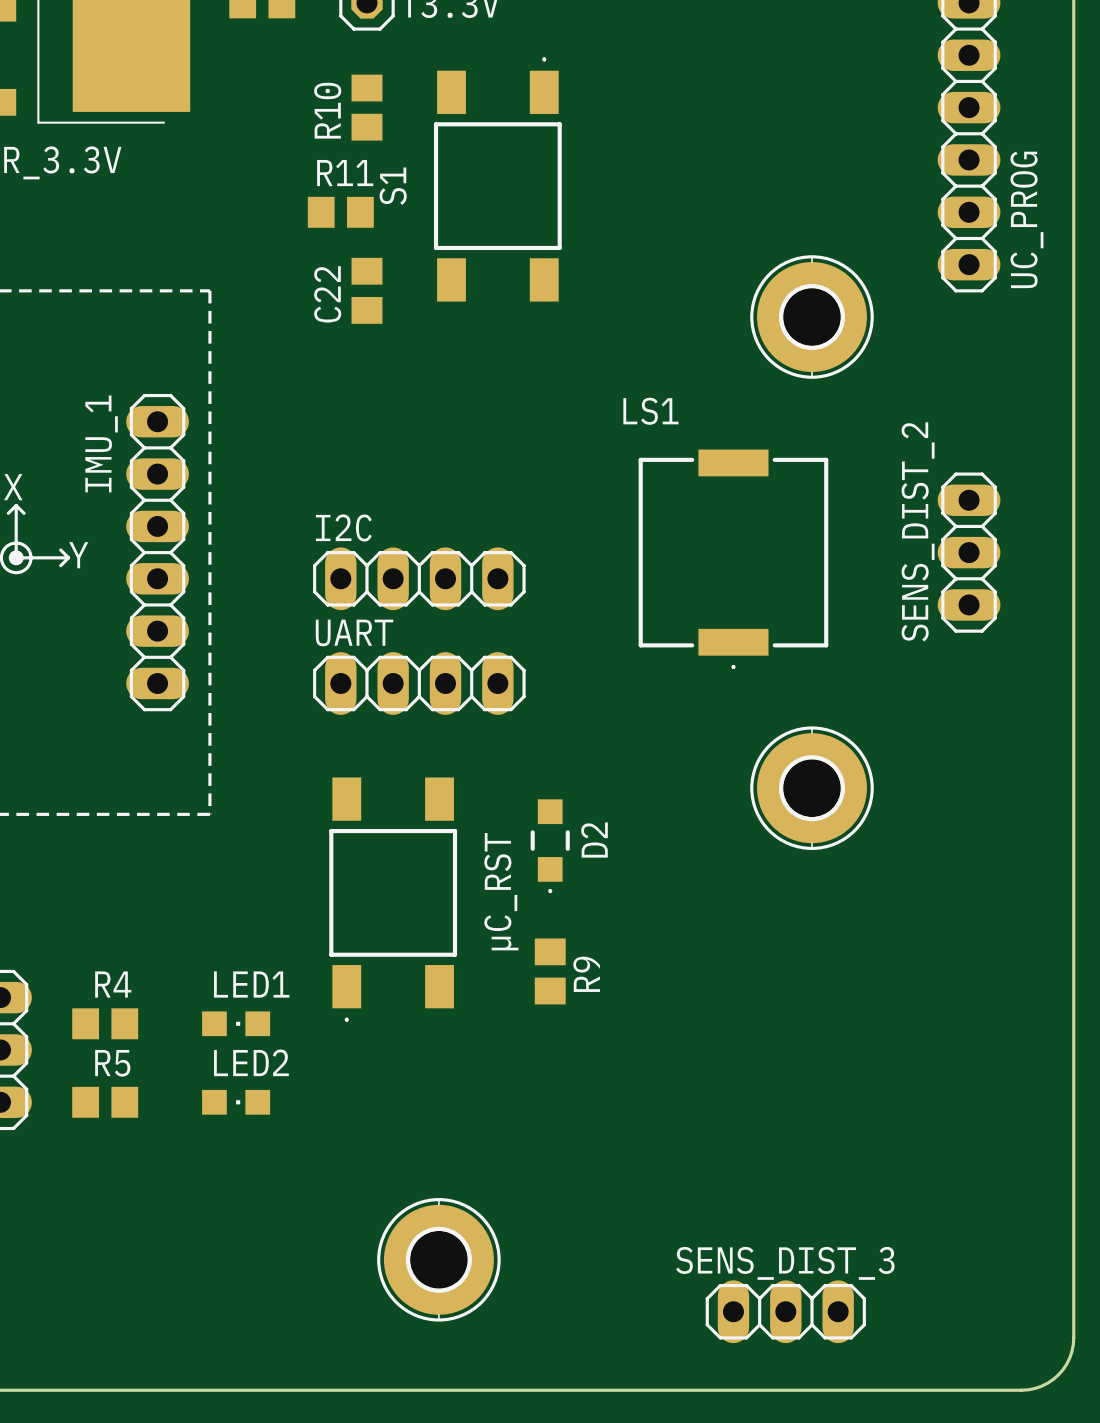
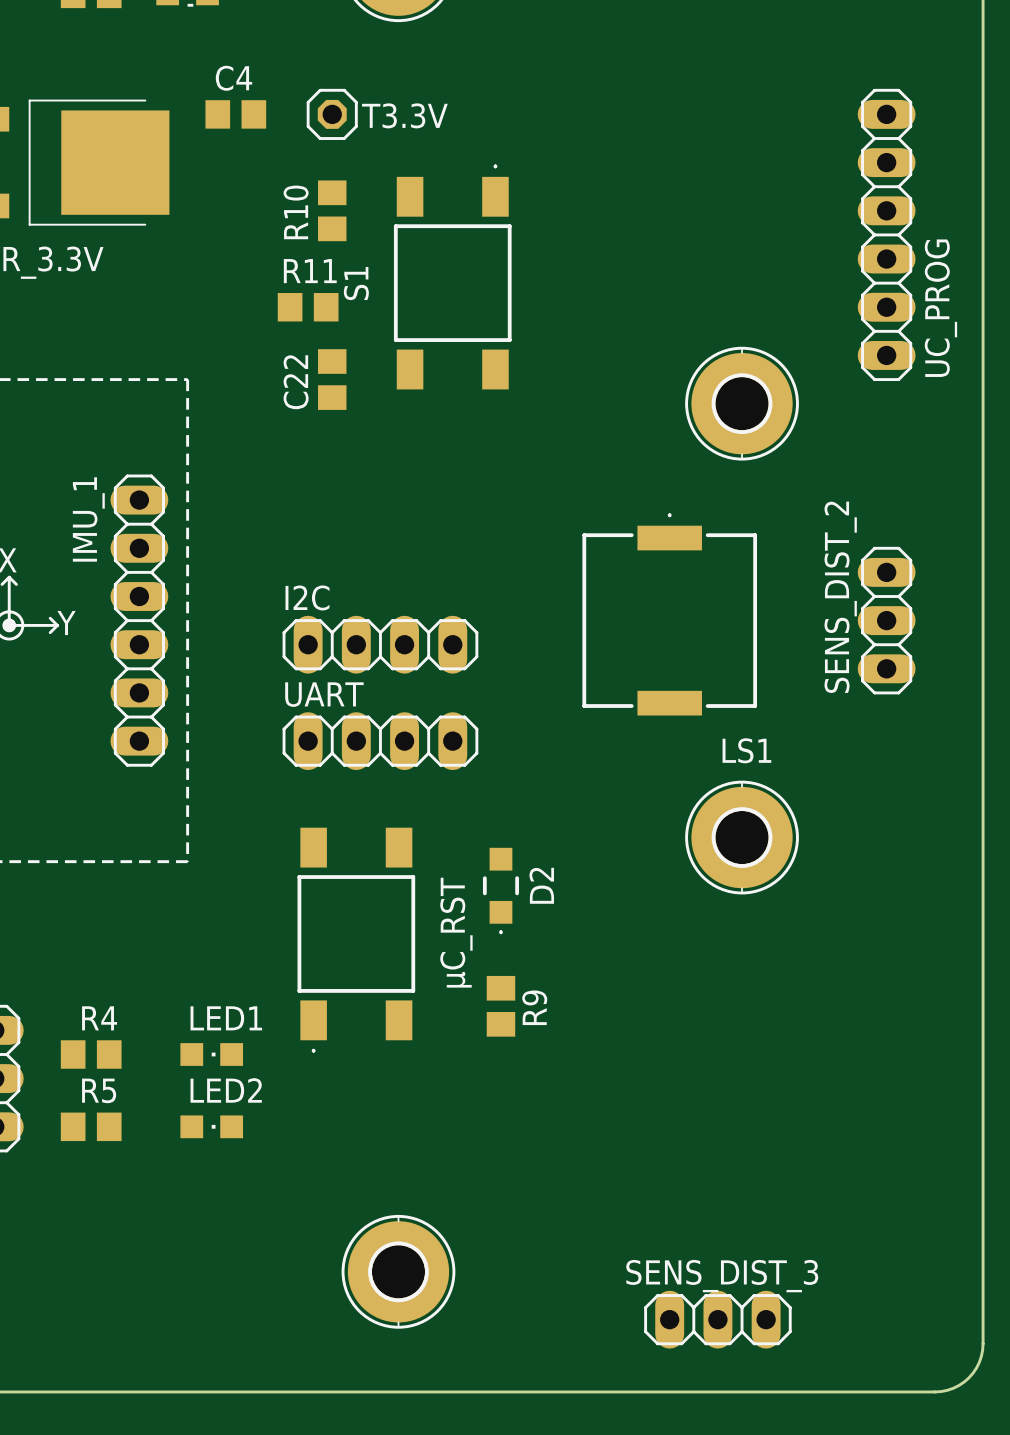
LS1 rotation: 0° (733, 559) -> 180° (669, 614)

